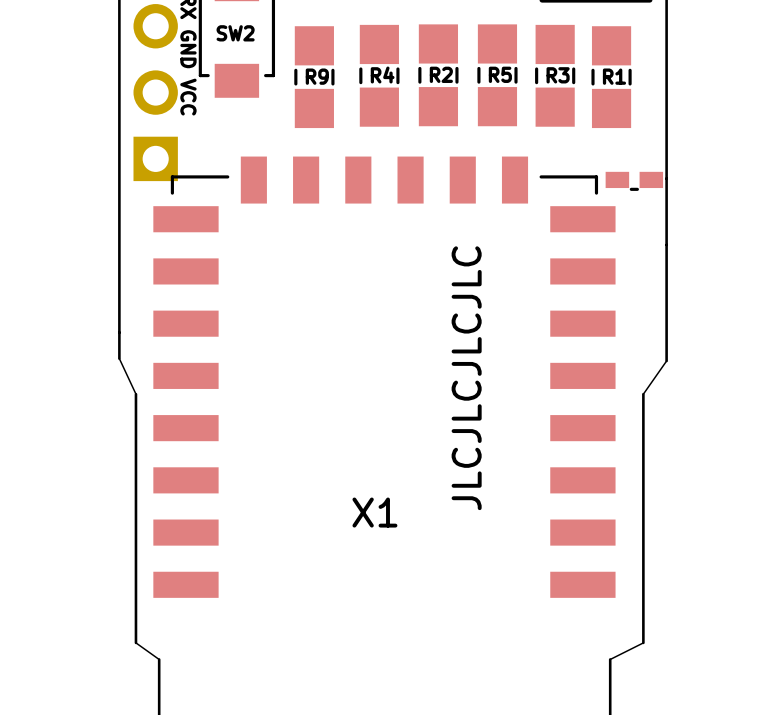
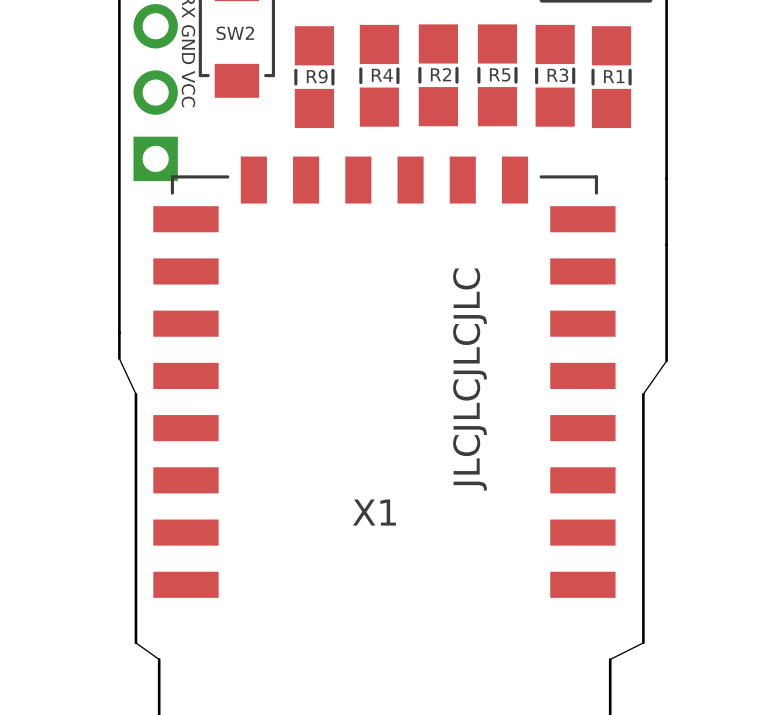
part: (634, 181) -> none

